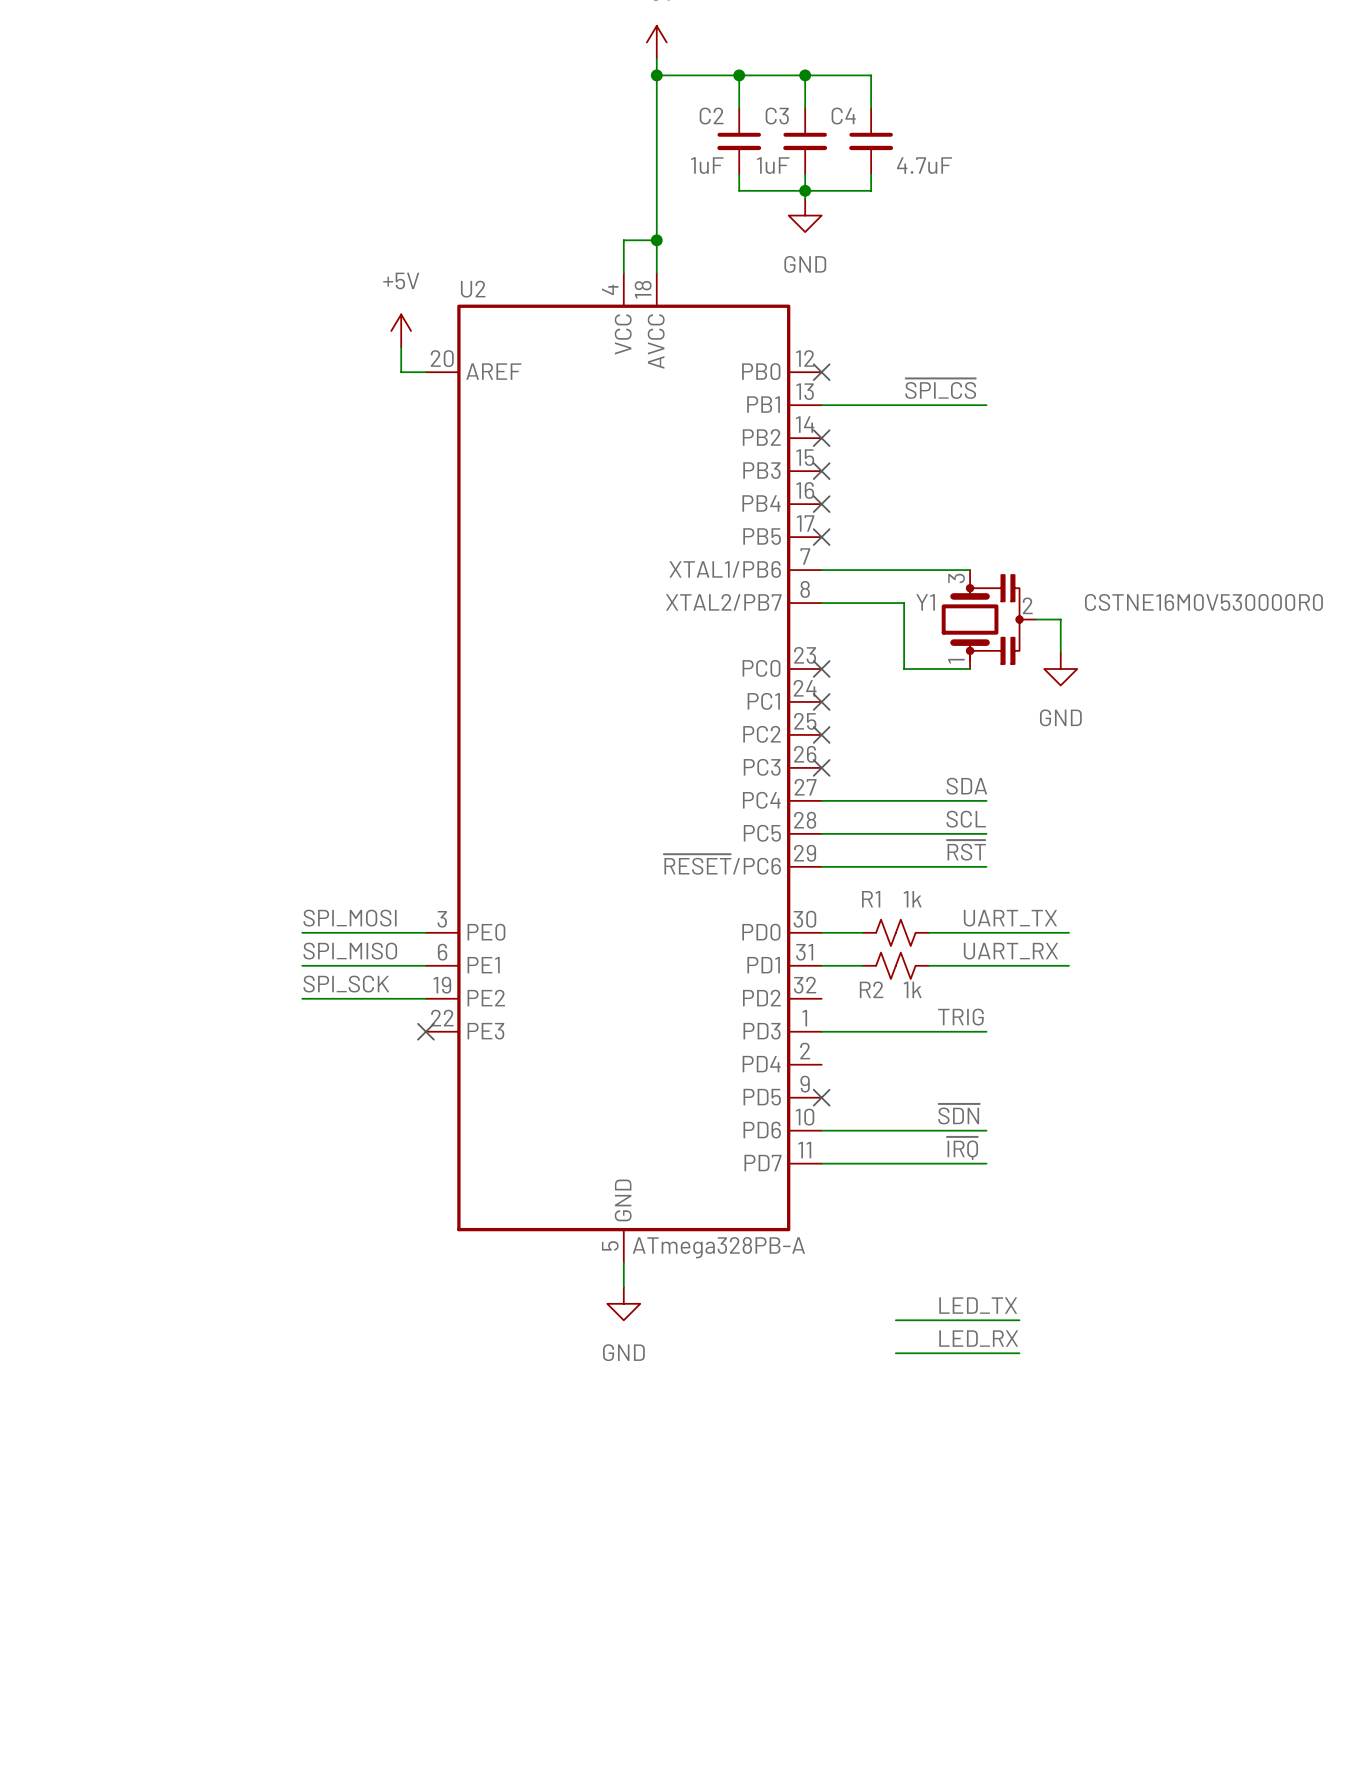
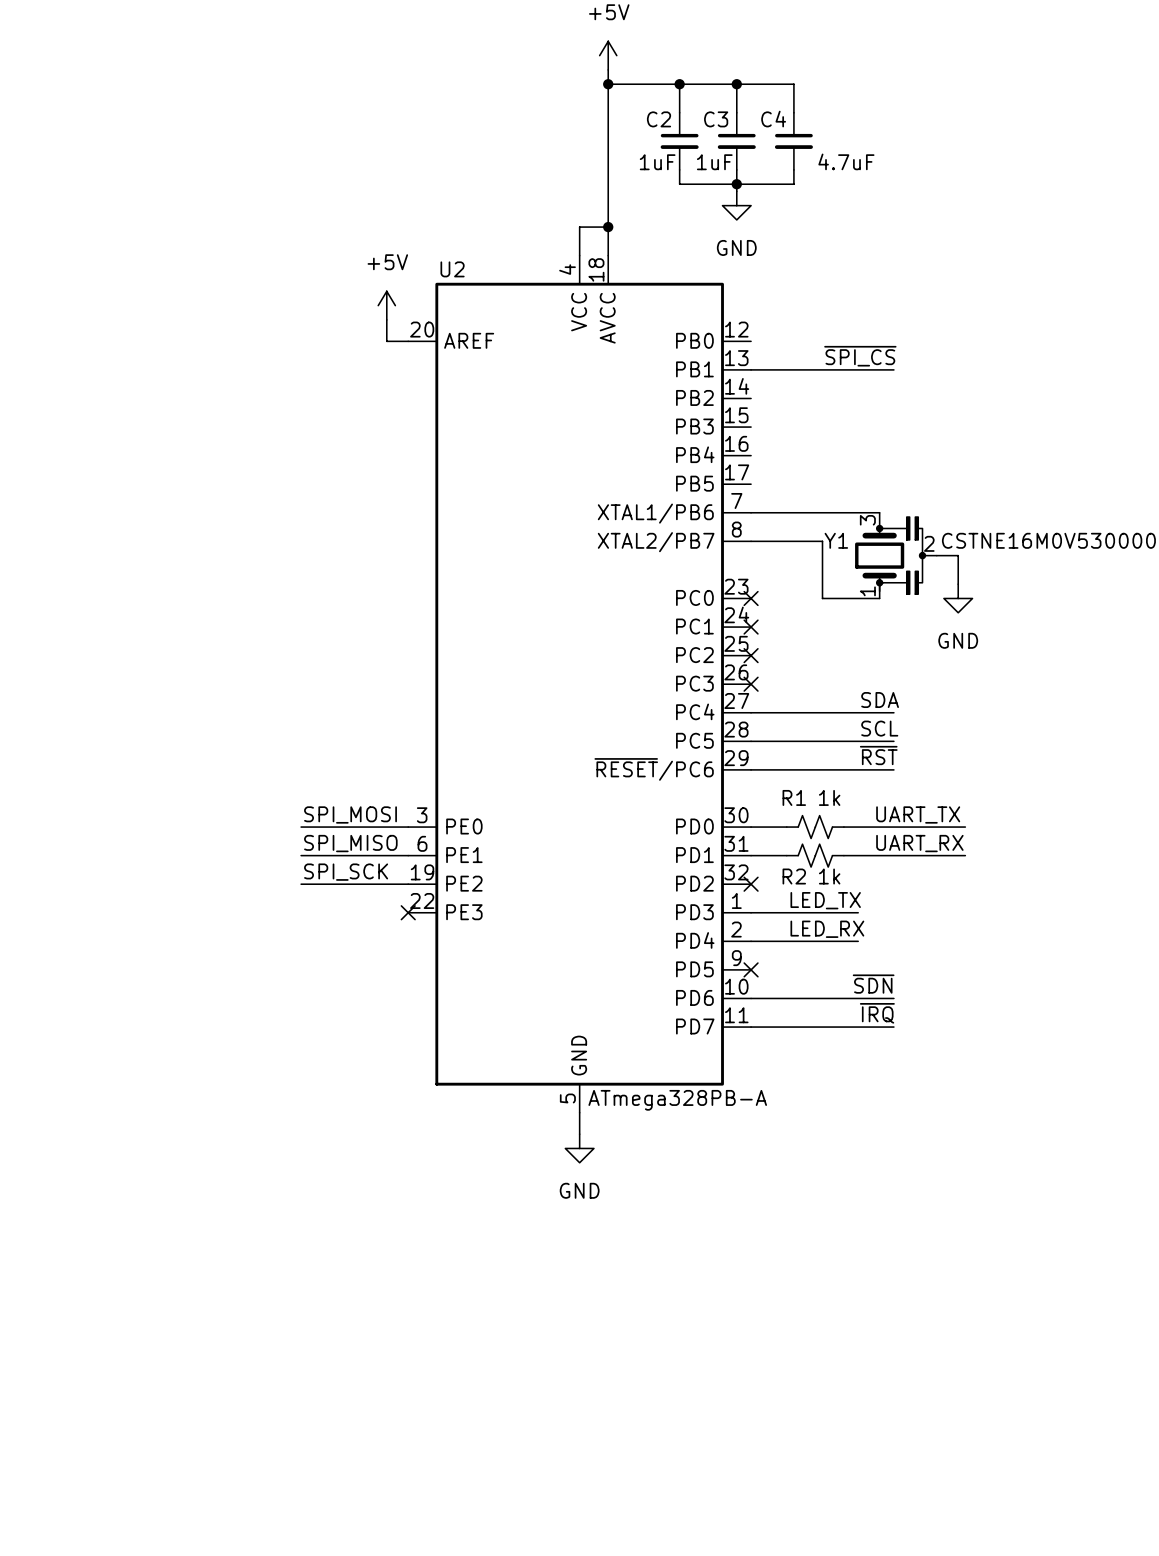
no-connect mark: (821, 372) -> none
no-connect mark: (821, 438) -> none
no-connect mark: (821, 471) -> none
no-connect mark: (821, 504) -> none
no-connect mark: (821, 537) -> none
no-connect mark: none -> (751, 884)
label: TRIG (960, 1017) -> none
wire: (945, 1031) (986, 1031) -> none
label position: LED_TX (978, 1305) -> LED_TX (825, 900)
wire: (895, 1320) (1019, 1320) -> (751, 941) (858, 941)
label position: LED_RX (978, 1338) -> LED_RX (827, 929)
wire: (895, 1353) (1019, 1353) -> none

